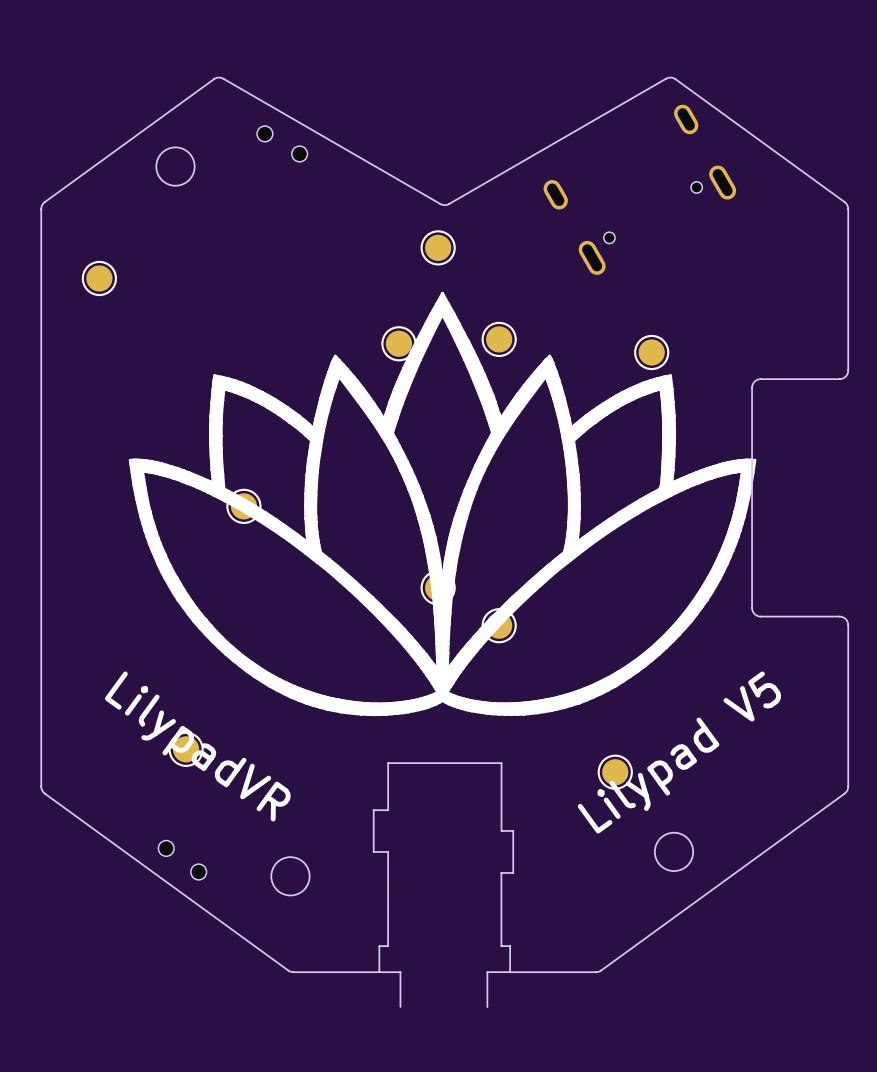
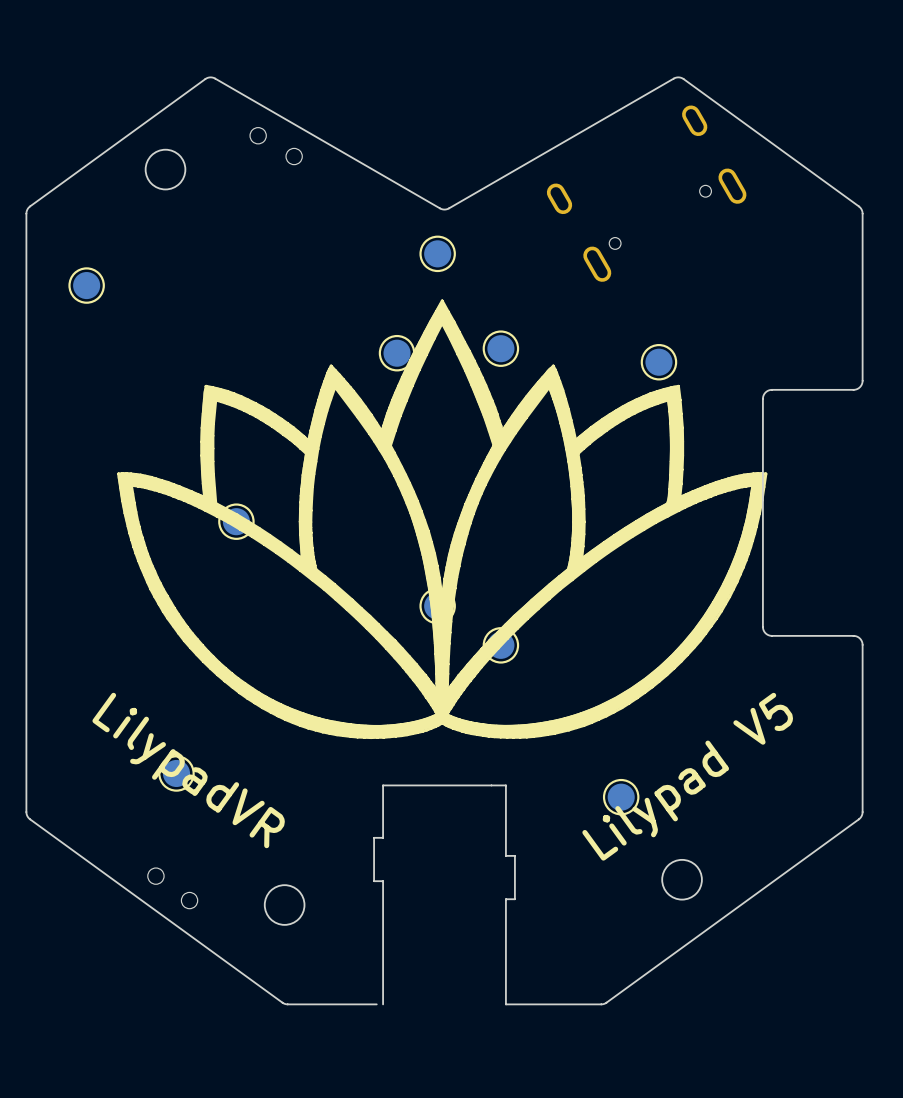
part: none -> (444, 894)
part: (443, 885) -> none

